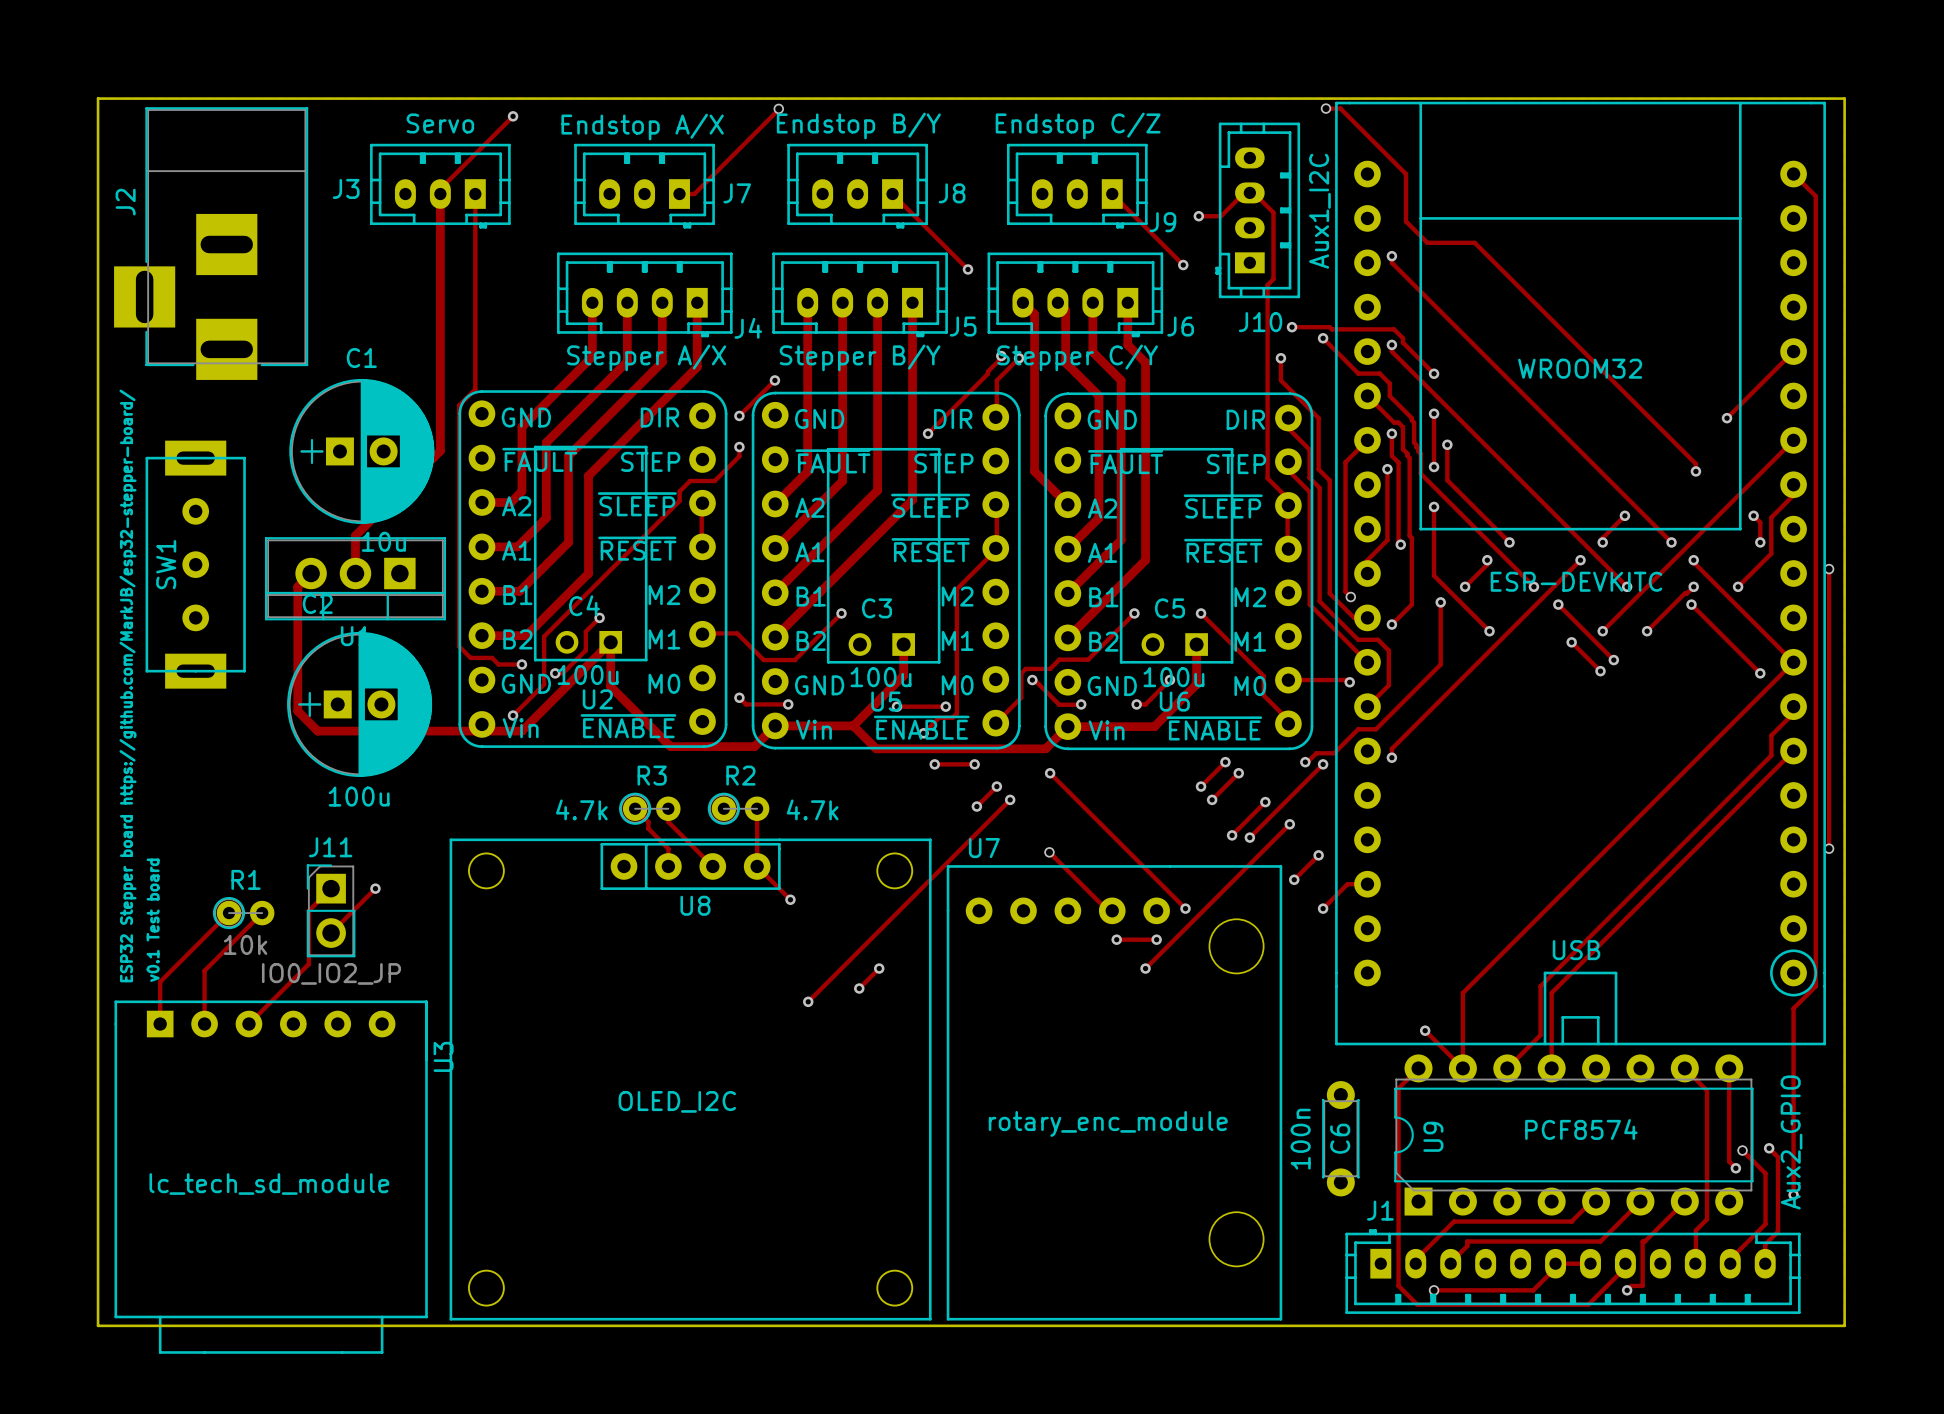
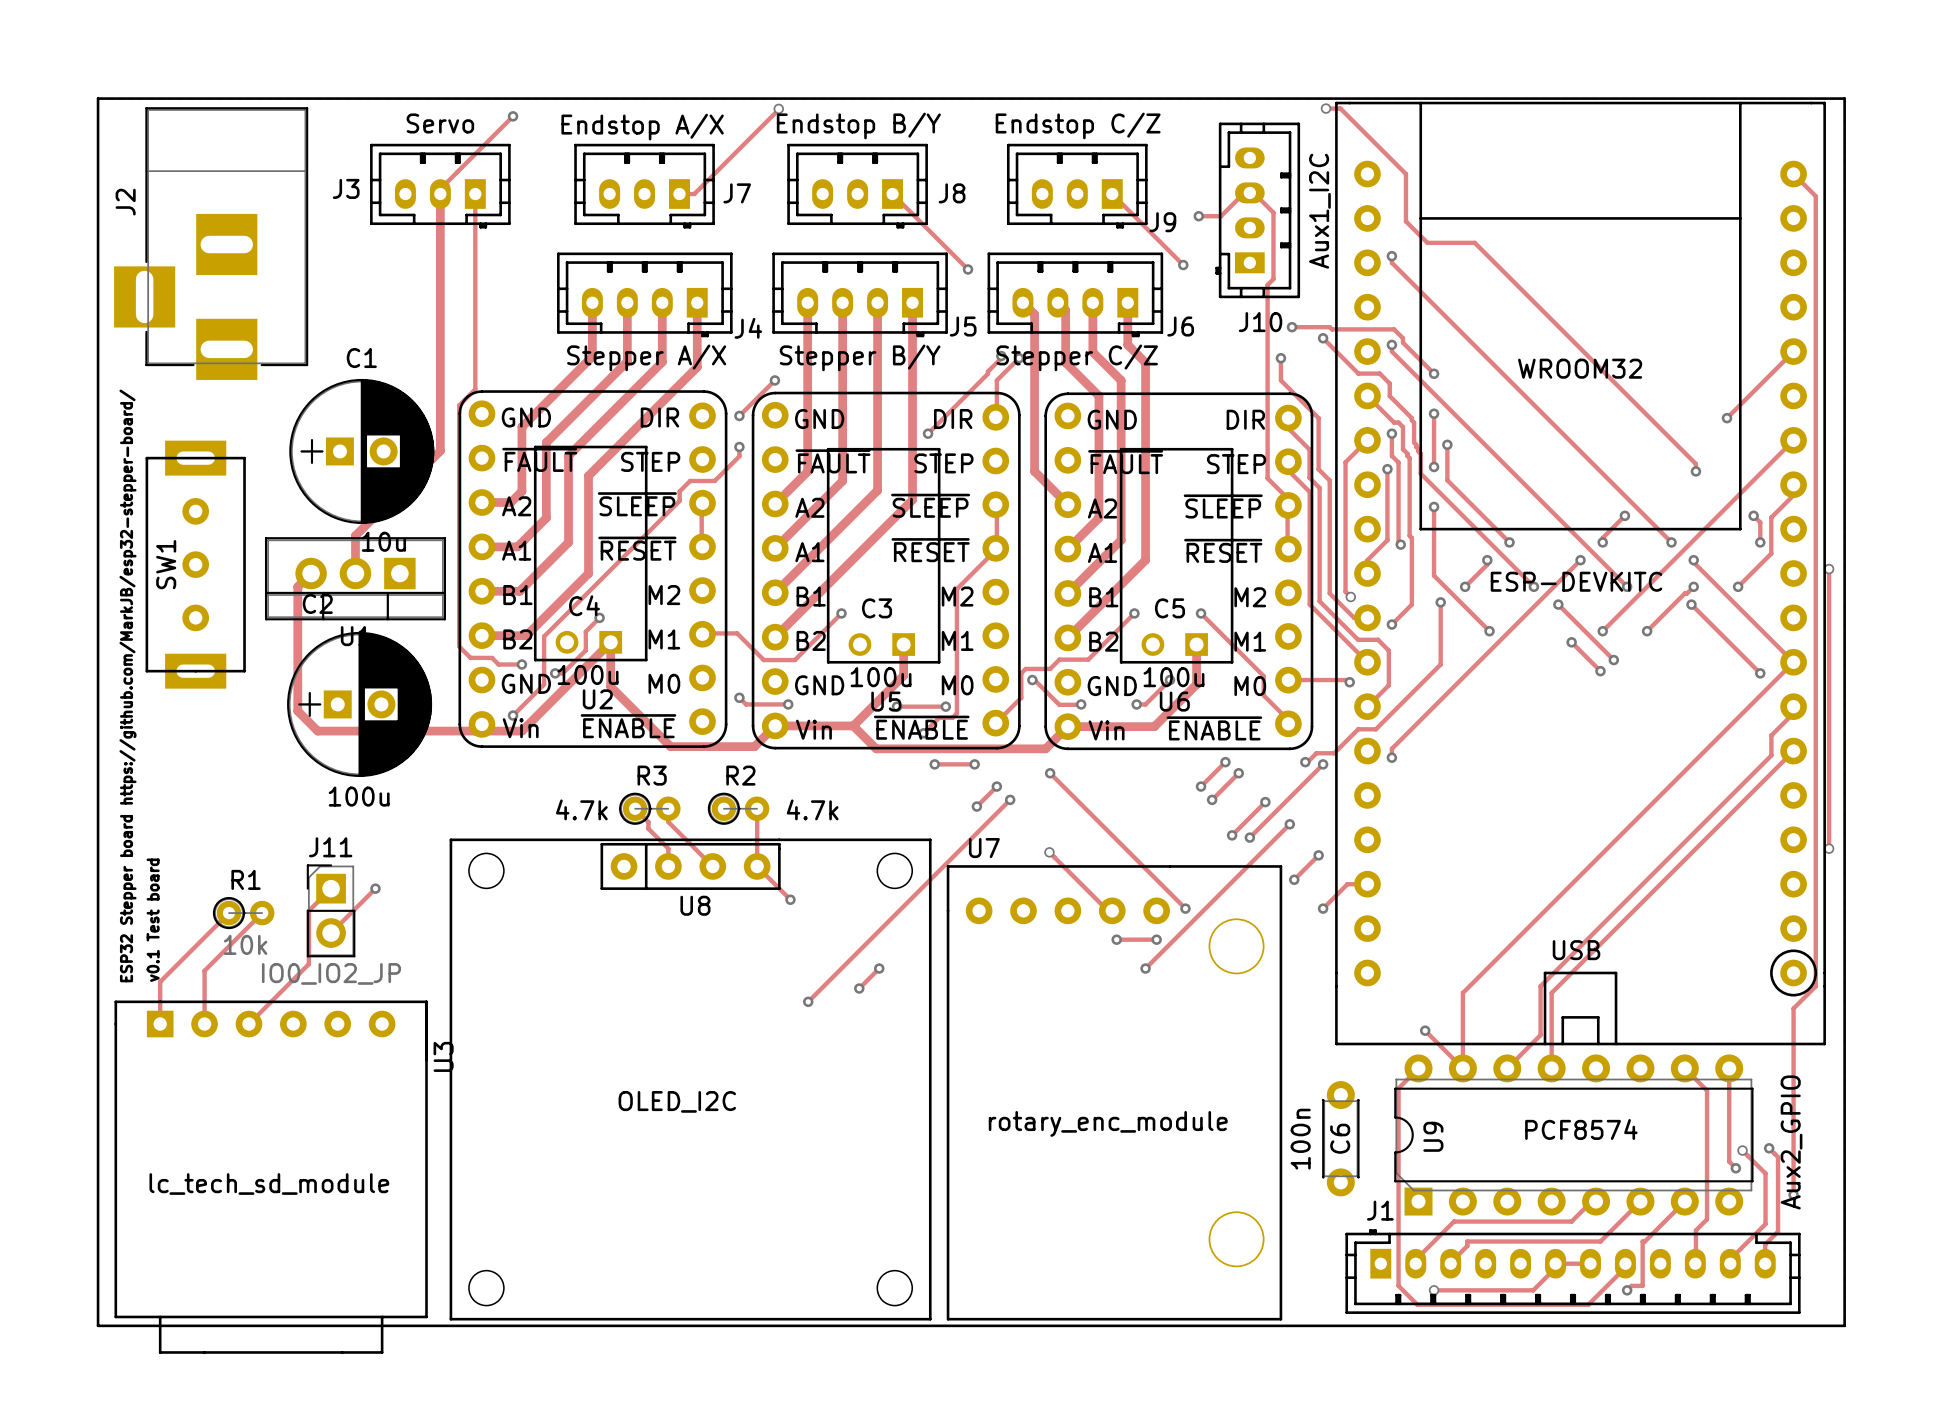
J6 value: Stepper C/Y (1077, 357) -> Stepper C/Z (1077, 357)

